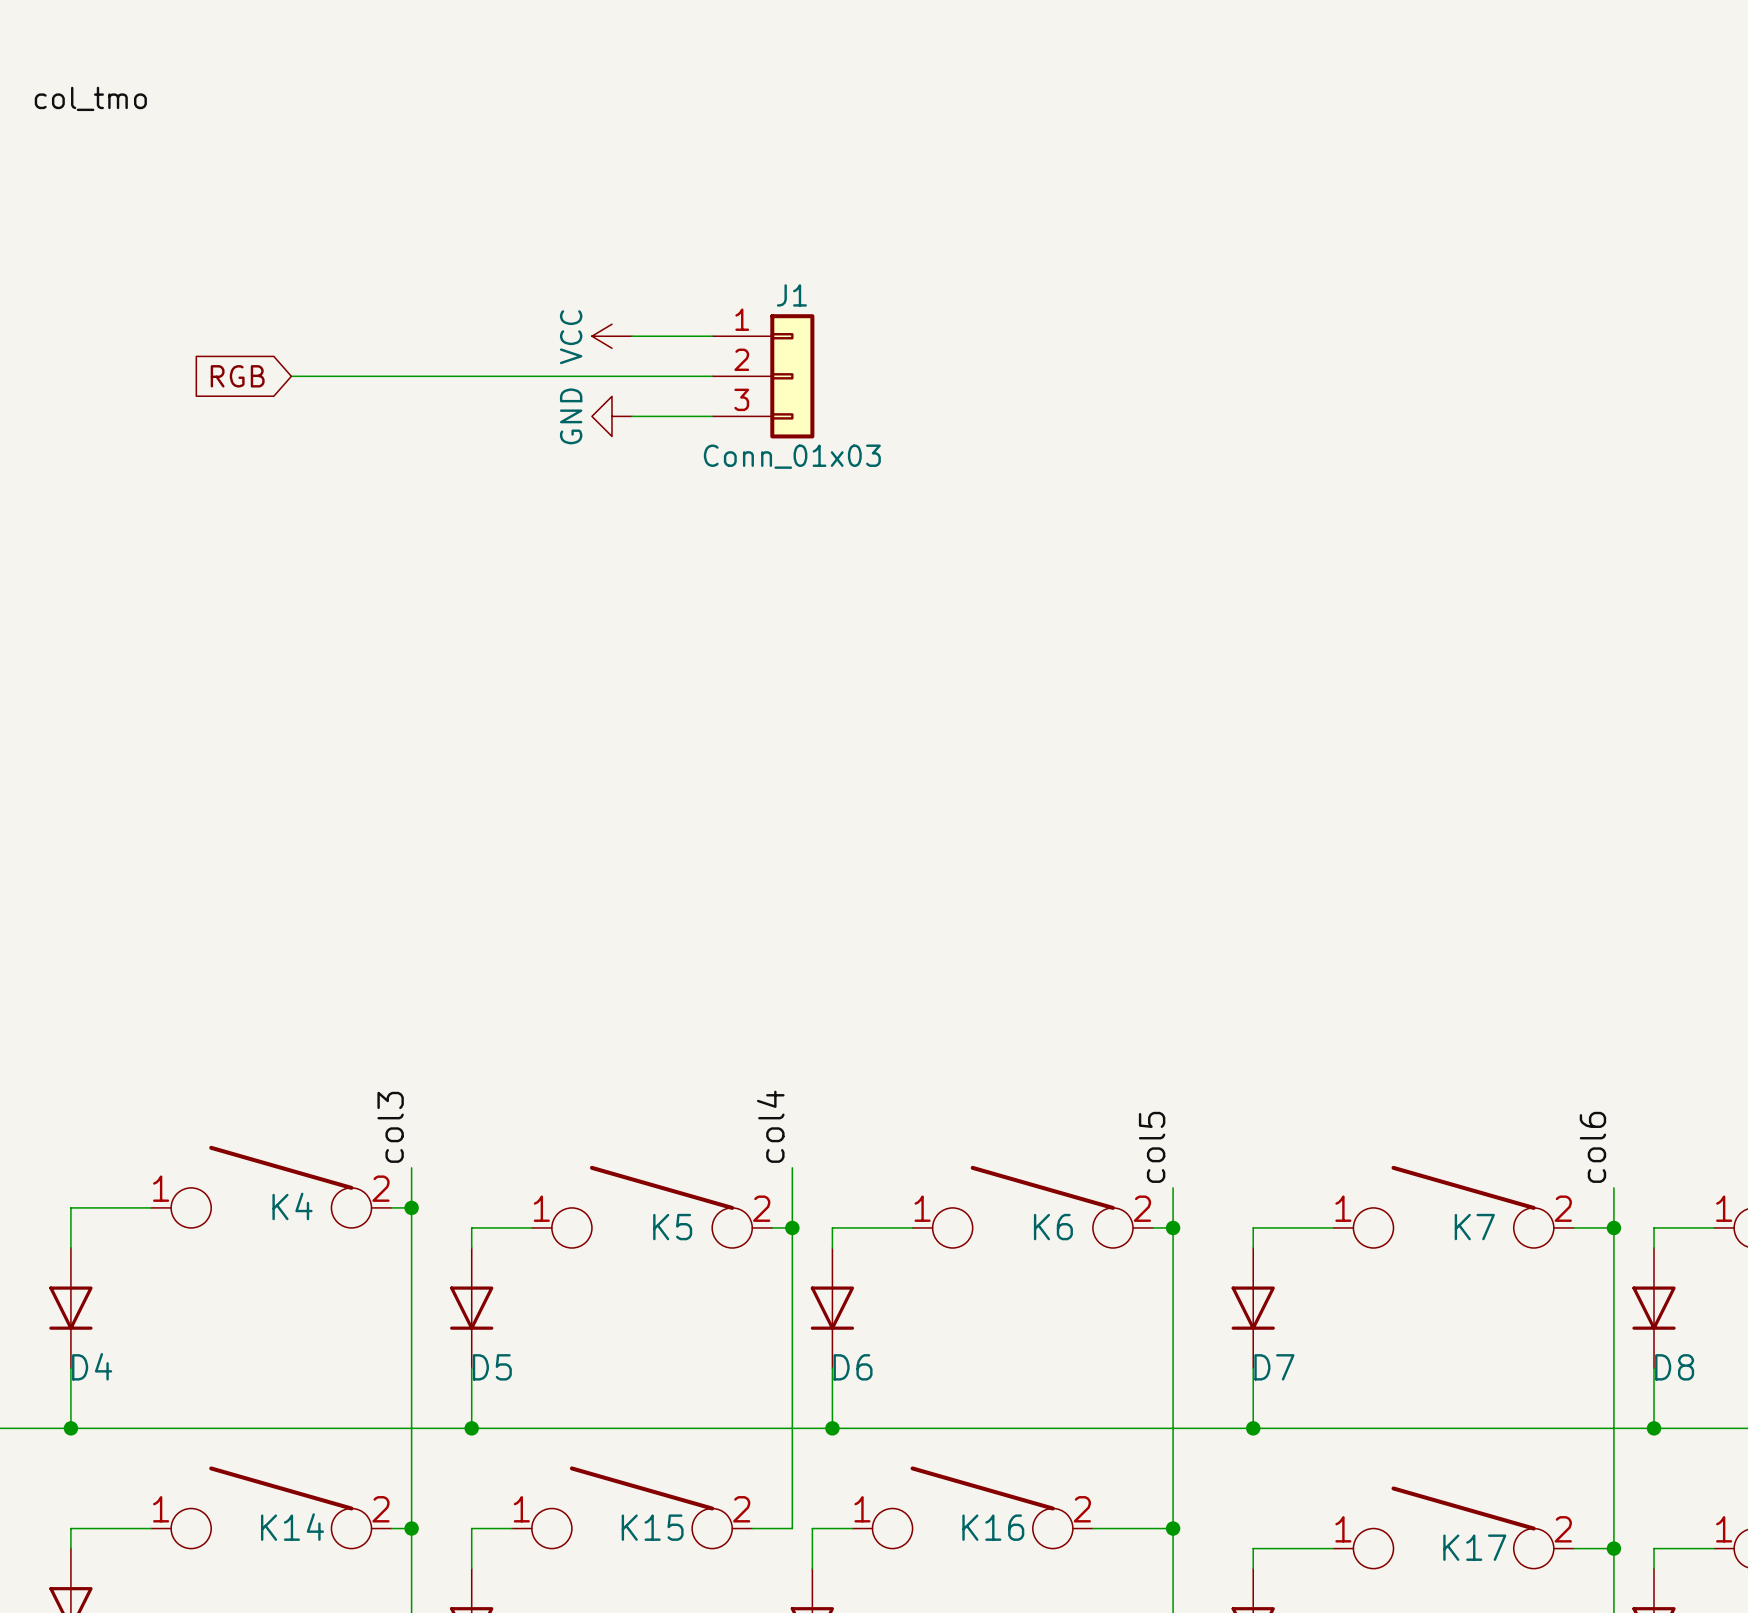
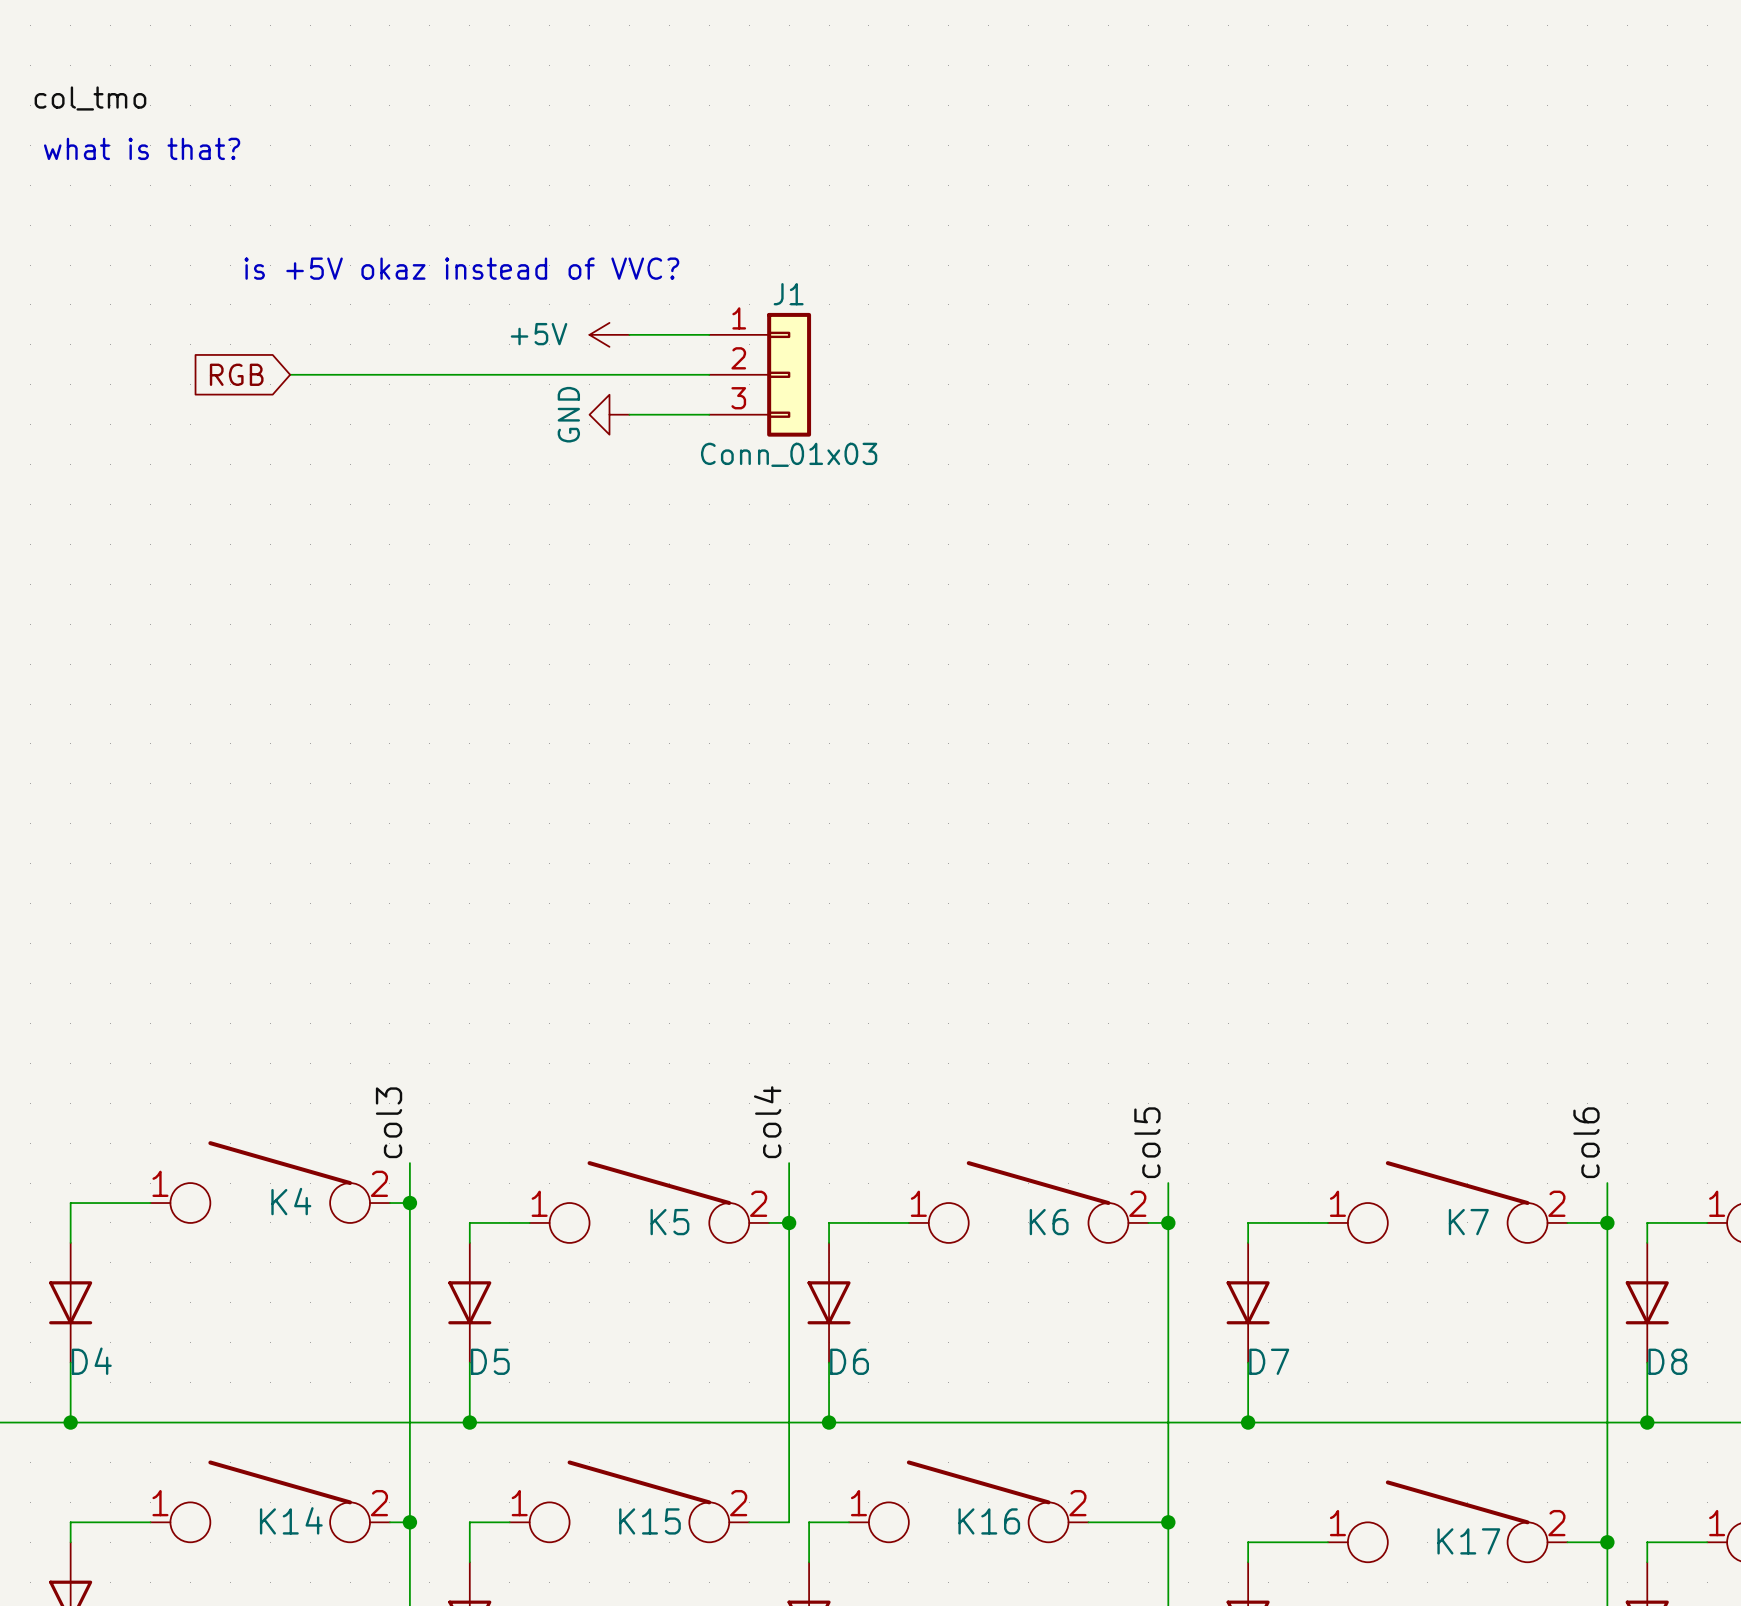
text: none -> what is that? (142, 148)
text: none -> is +5V okaz instead of VVC? (461, 268)
power symbol: VCC (611, 336) -> +5V (609, 334)

